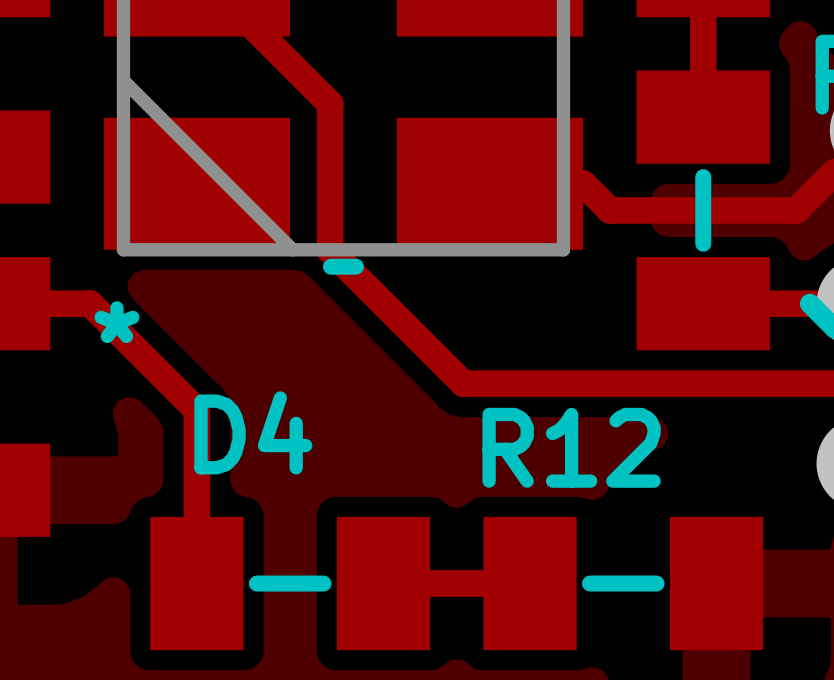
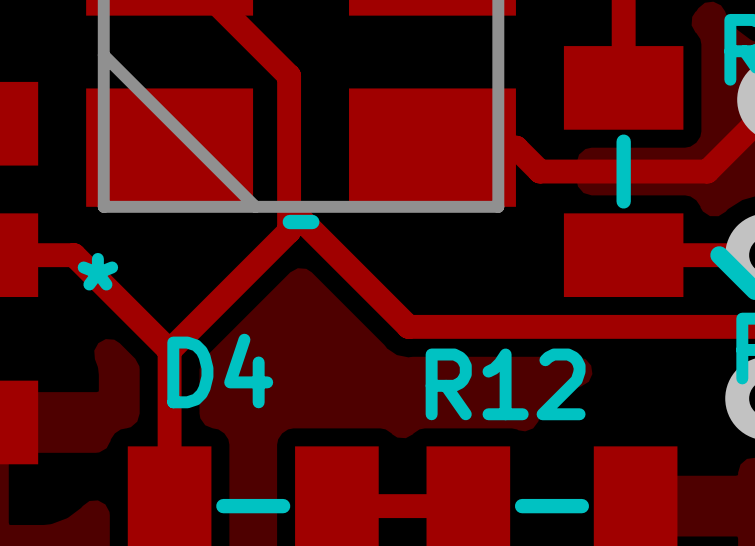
track: none -> (289, 207) (289, 231) (169, 350)

